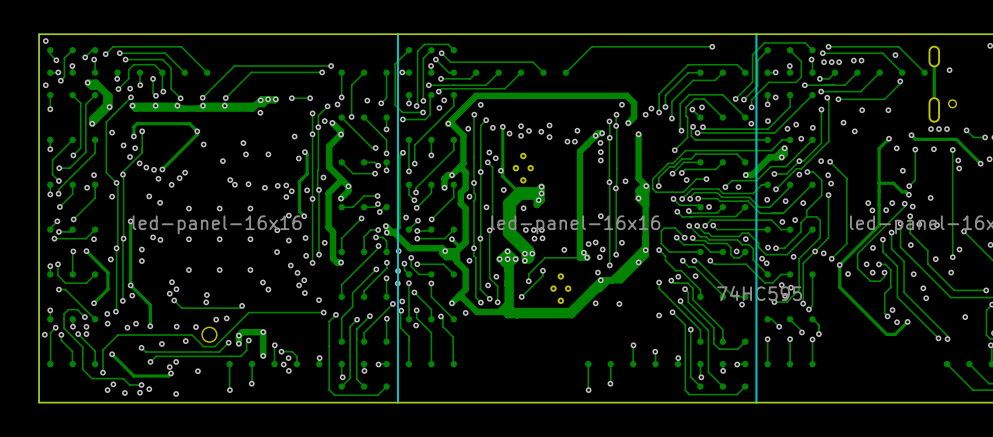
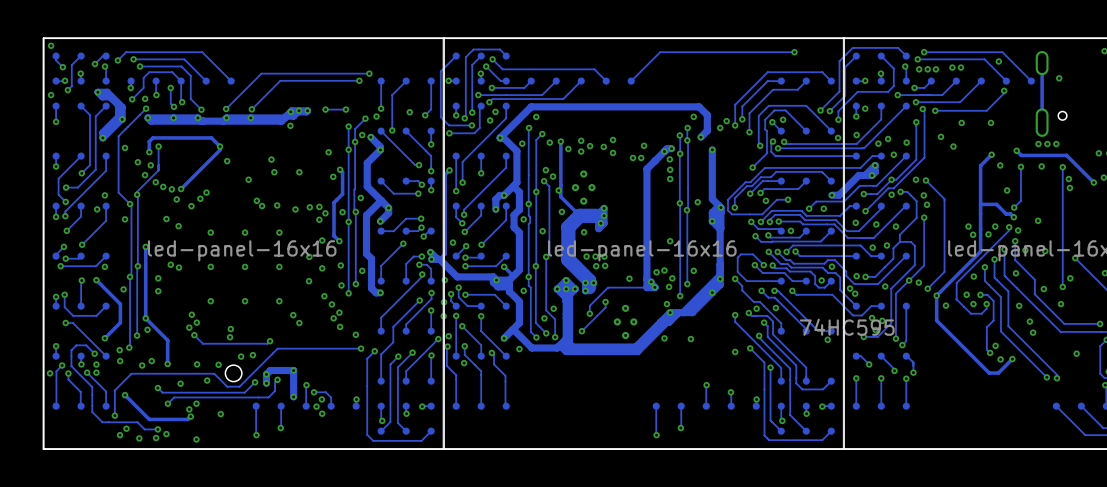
track: (966, 130) (973, 137) (985, 137) -> none
via: (966, 130) -> none

